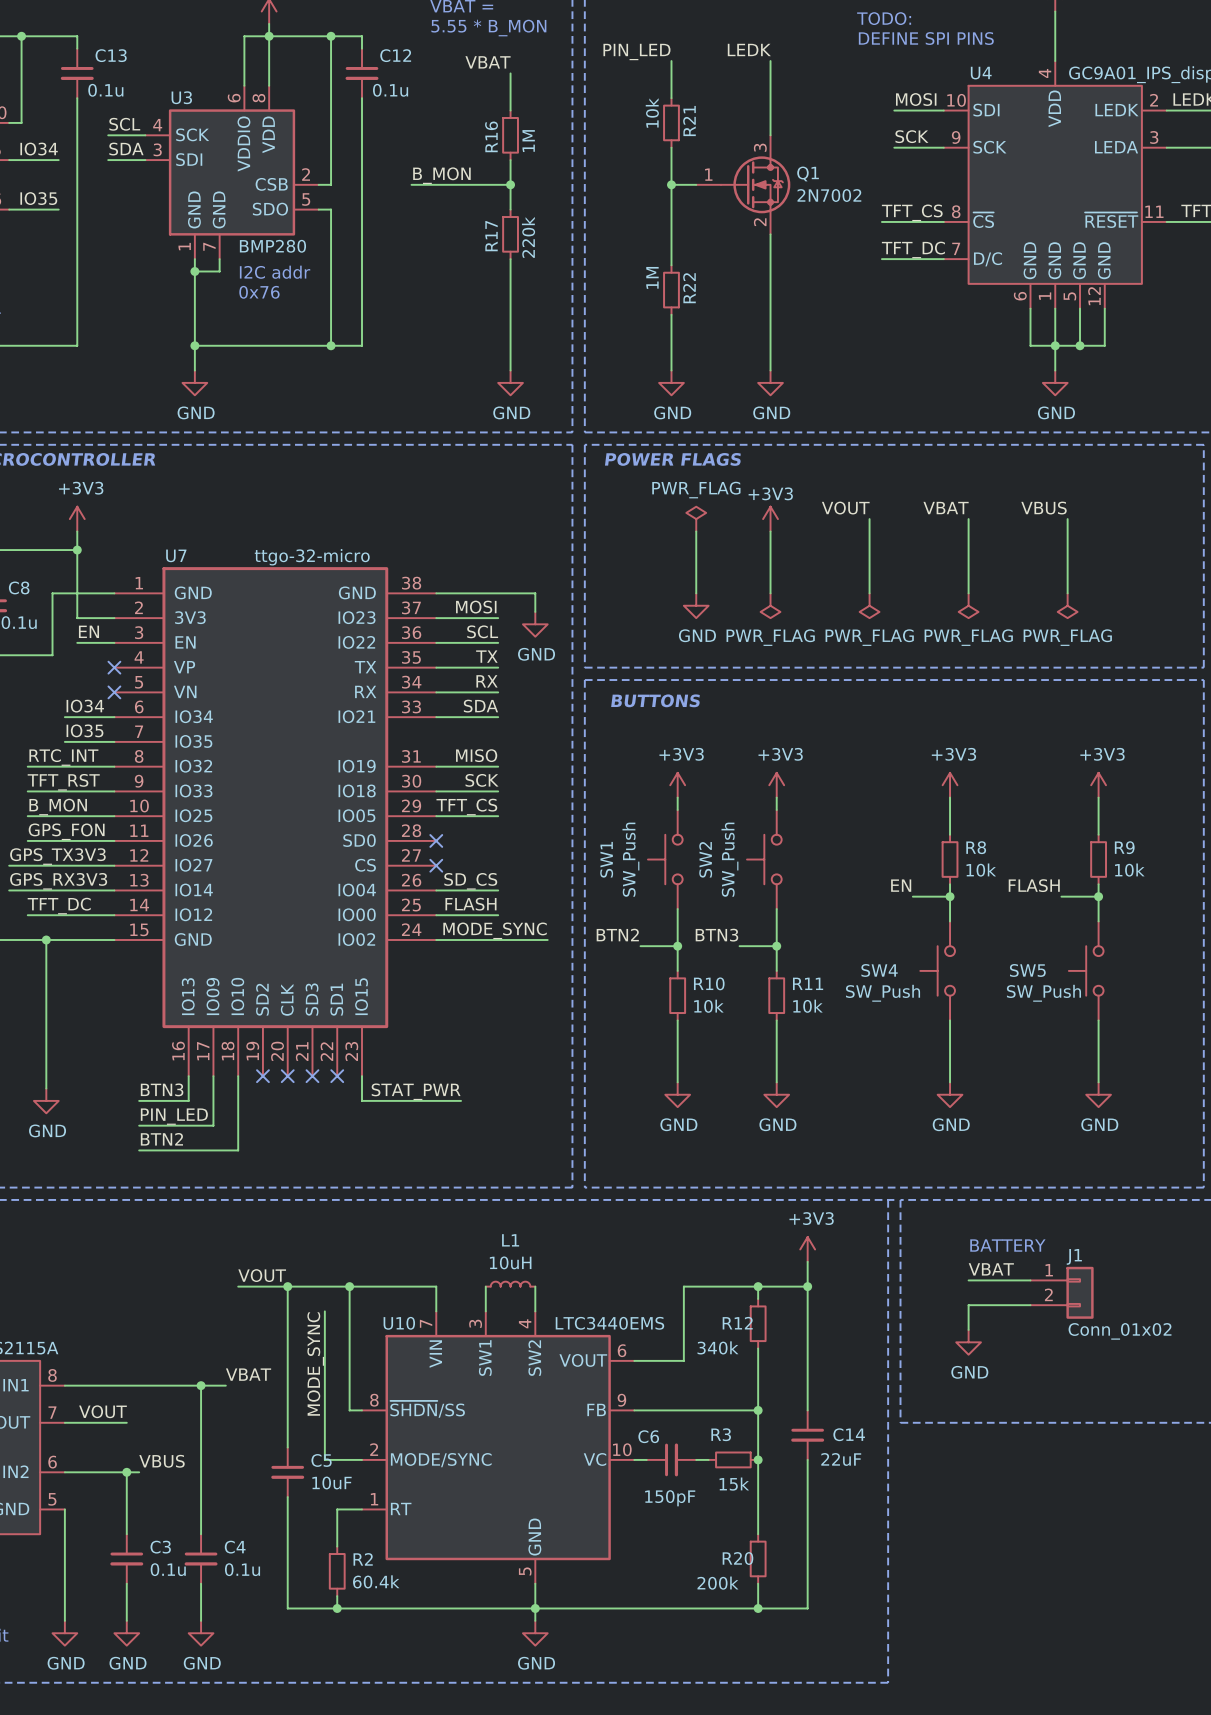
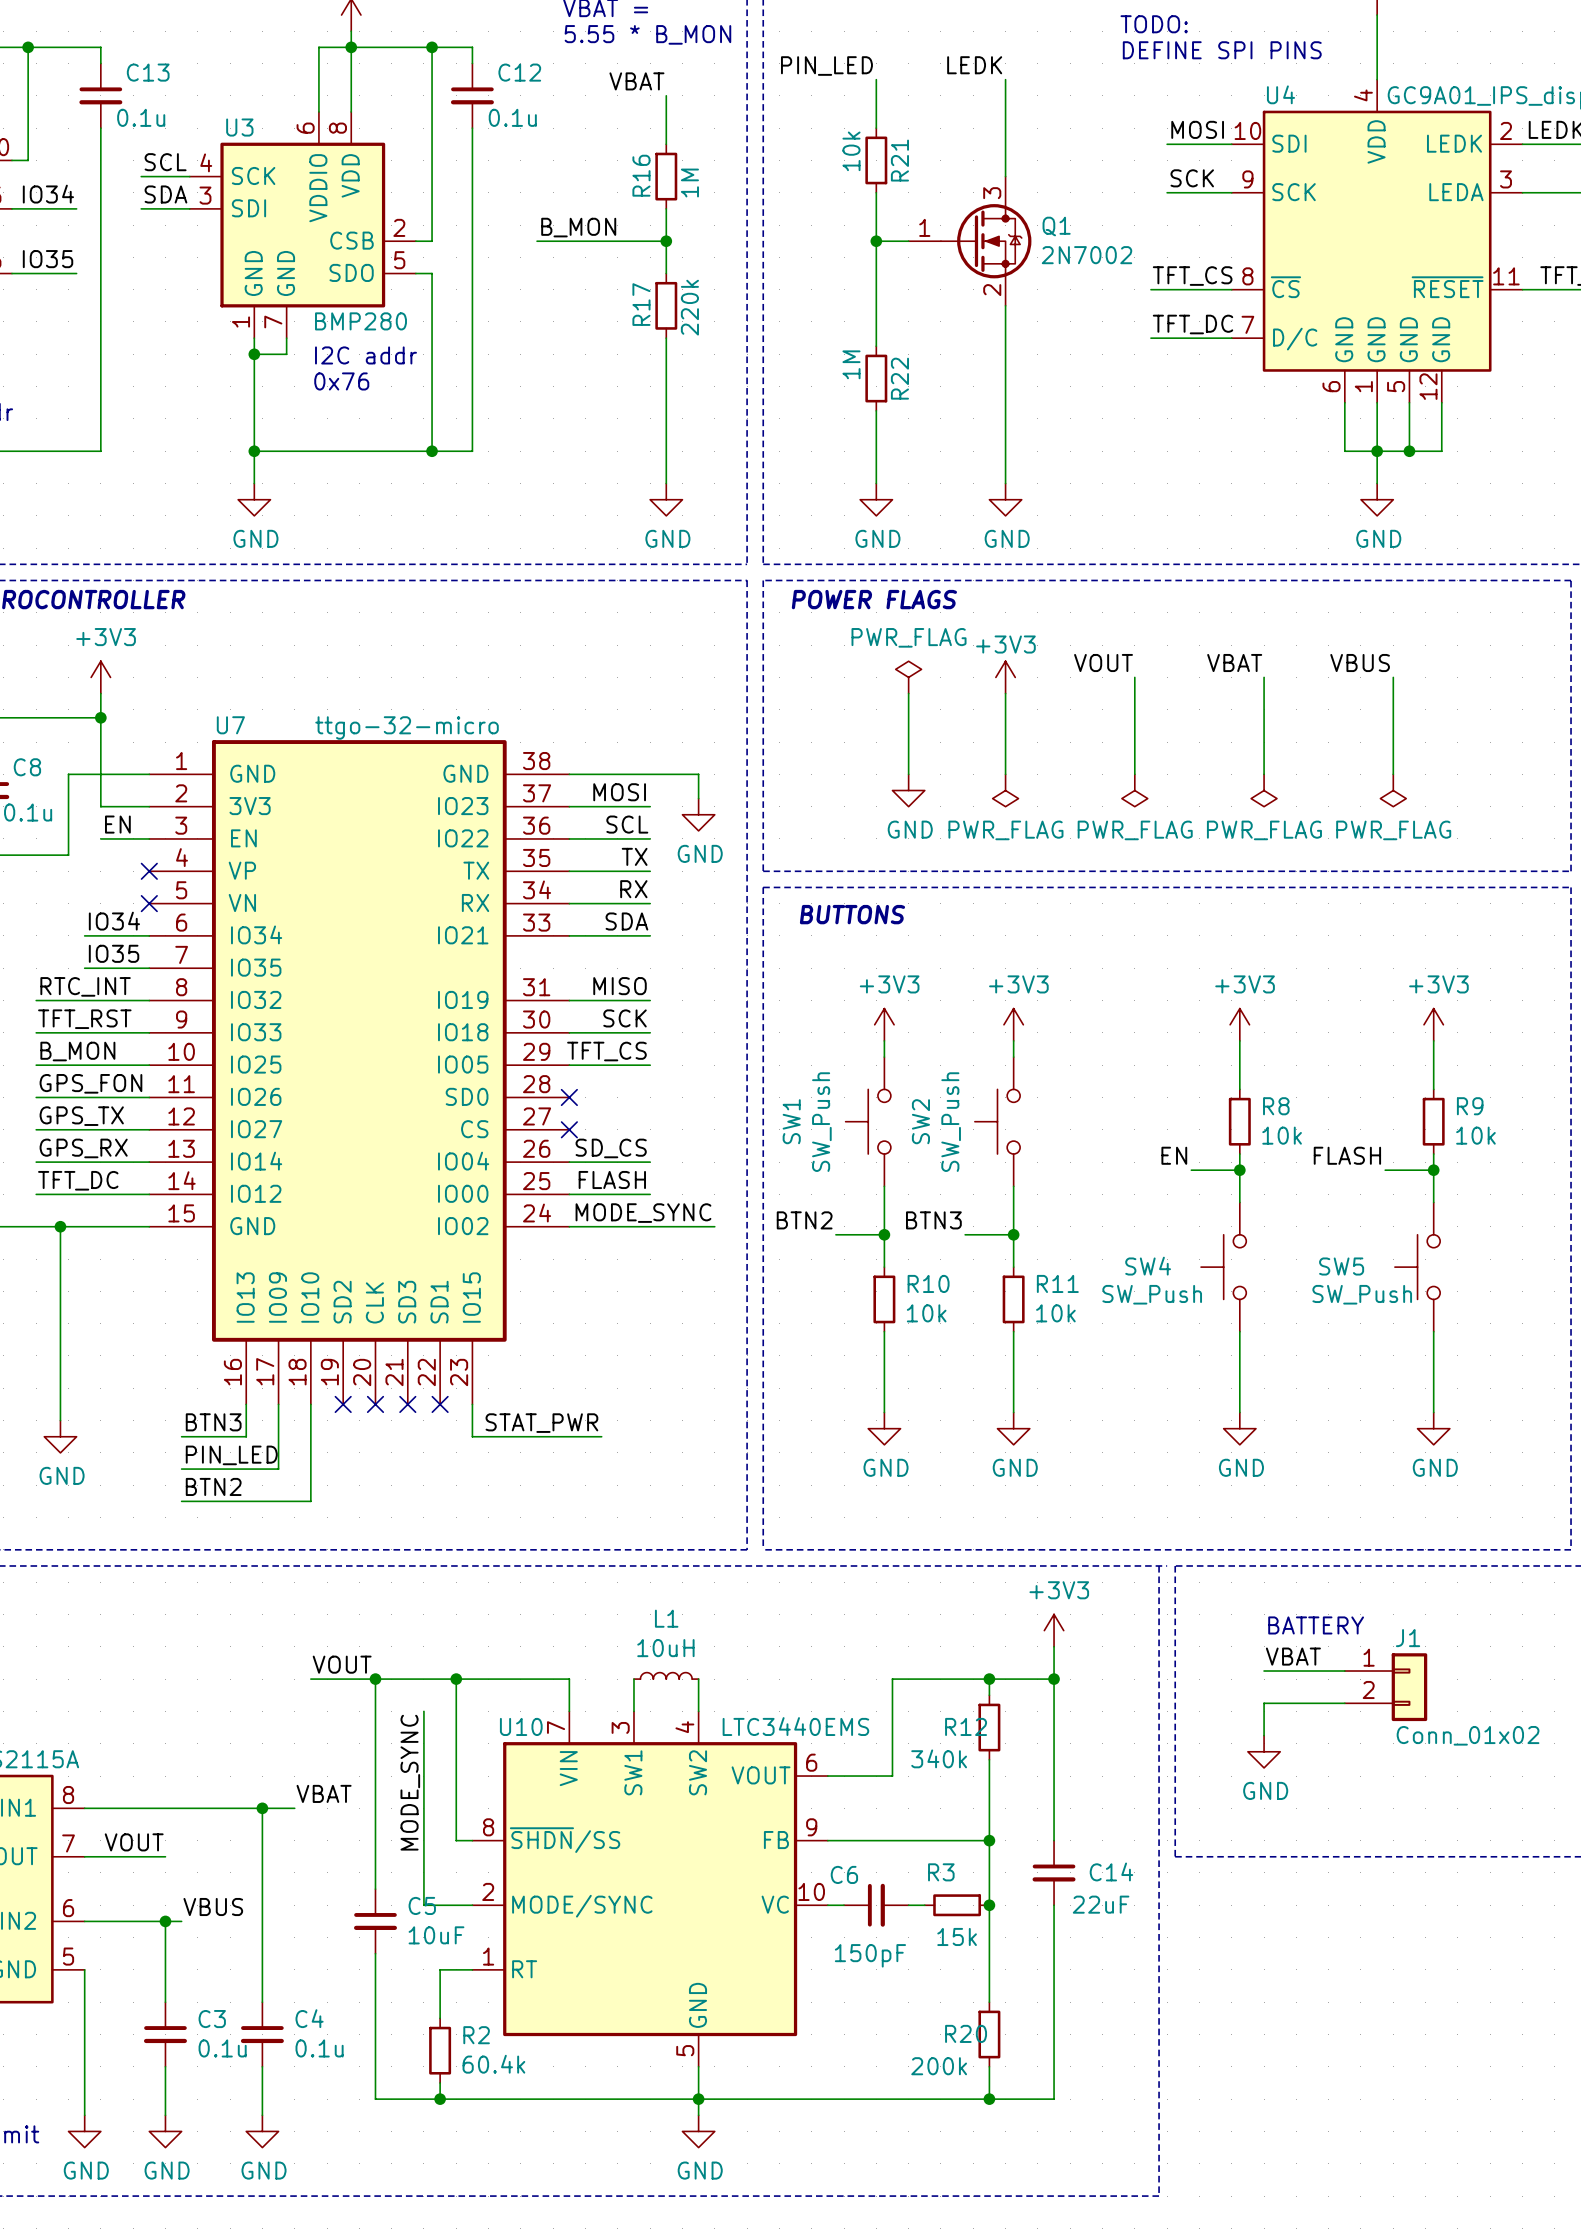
label: GPS_TX3V3 (57, 856) -> none
label: none -> GPS_TX (81, 1116)
wire: (9, 865) (27, 865) -> none
label: GPS_RX3V3 (58, 881) -> none
label: none -> GPS_RX (83, 1148)
wire: (9, 890) (27, 890) -> none

